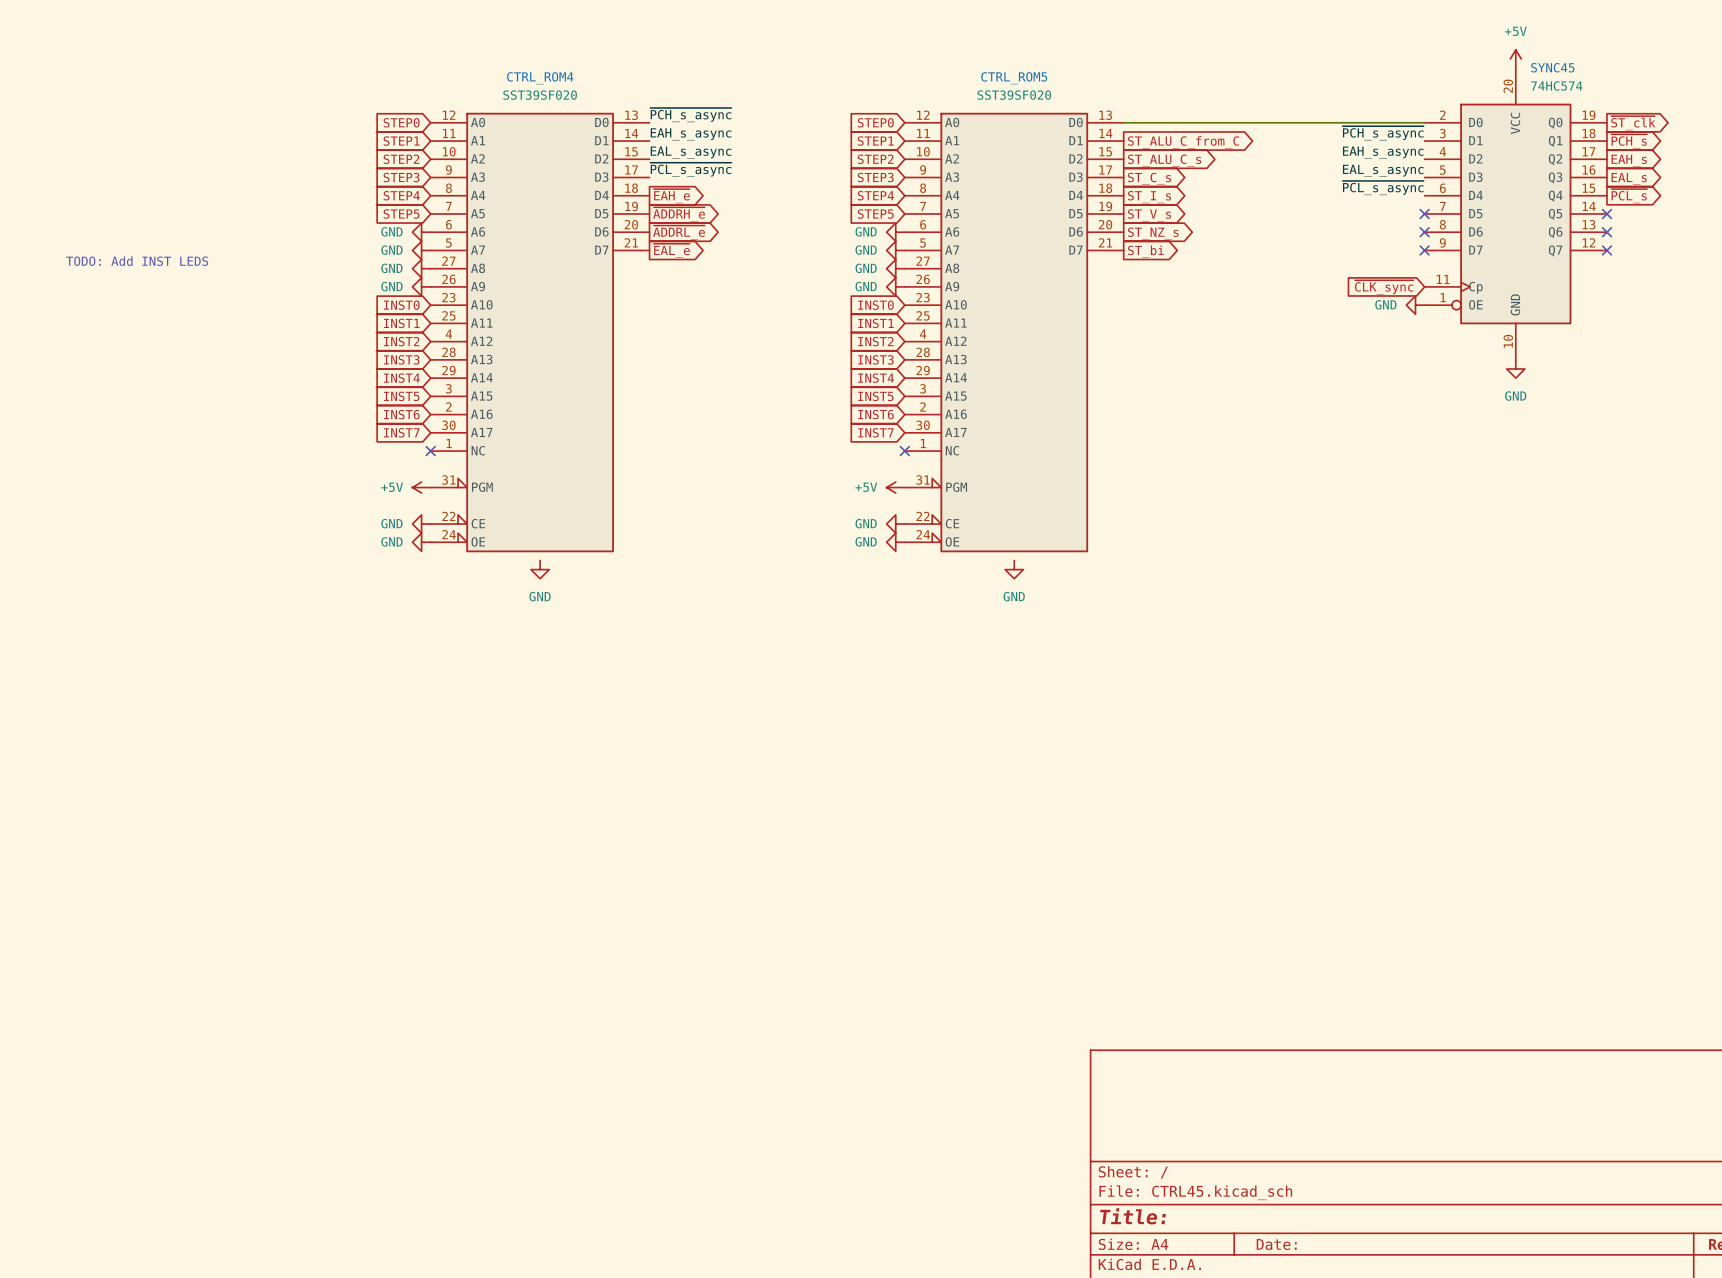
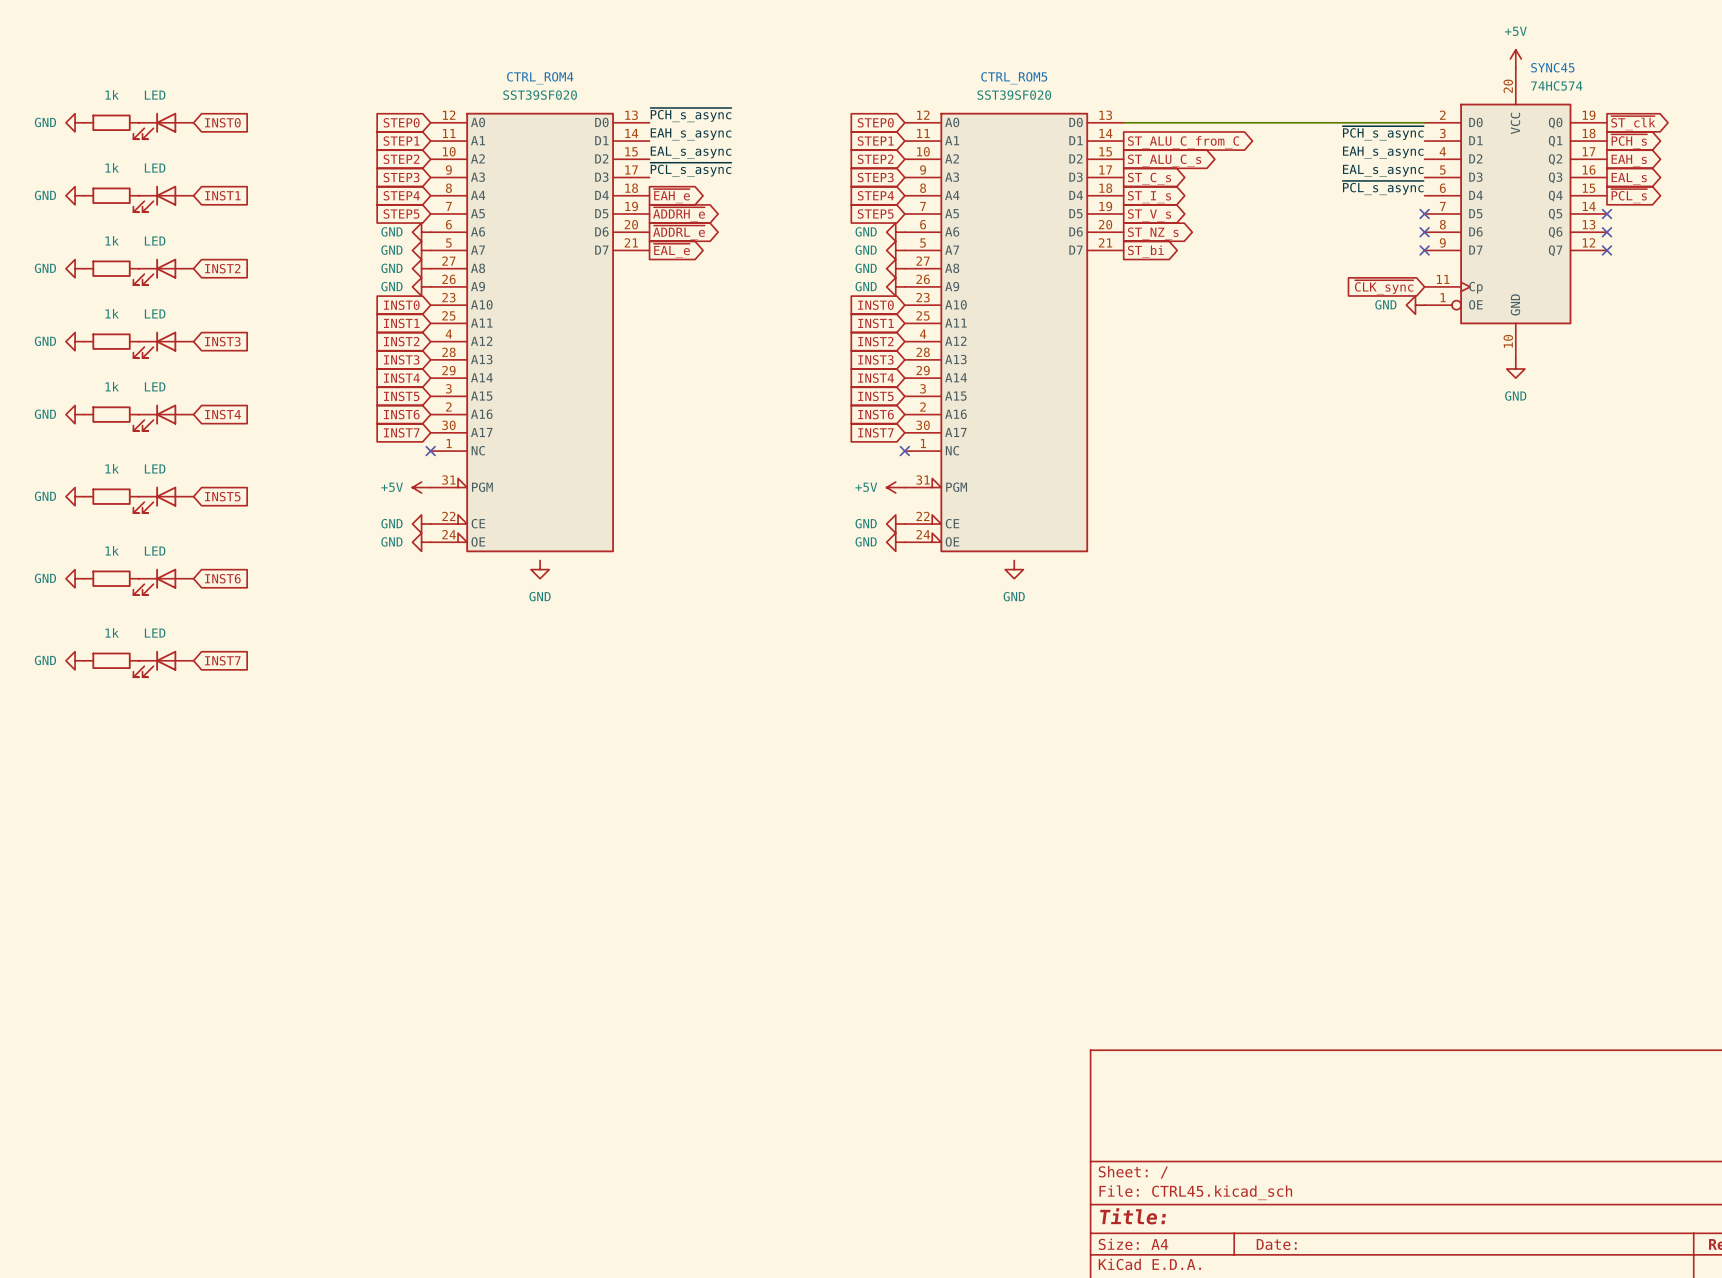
power symbol: none -> GND (75, 122)
part: none -> 1k (111, 122)
global label: none -> INST0 (222, 122)
part: none -> LED (163, 125)
power symbol: none -> GND (75, 195)
part: none -> 1k (111, 195)
global label: none -> INST1 (222, 195)
part: none -> LED (163, 198)
text: TODO: Add INST LEDS (137, 261) -> none
power symbol: none -> GND (75, 268)
part: none -> 1k (111, 268)
global label: none -> INST2 (222, 268)
part: none -> LED (163, 271)
power symbol: none -> GND (75, 341)
part: none -> 1k (111, 341)
global label: none -> INST3 (222, 341)
part: none -> LED (163, 344)
power symbol: none -> GND (75, 414)
part: none -> 1k (111, 414)
global label: none -> INST4 (223, 414)
part: none -> LED (163, 417)
power symbol: none -> GND (75, 496)
part: none -> 1k (111, 496)
global label: none -> INST5 (222, 496)
part: none -> LED (163, 499)
power symbol: none -> GND (75, 578)
part: none -> 1k (111, 578)
global label: none -> INST6 (222, 578)
part: none -> LED (163, 581)
power symbol: none -> GND (75, 660)
part: none -> 1k (111, 660)
global label: none -> INST7 (222, 660)
part: none -> LED (163, 663)

